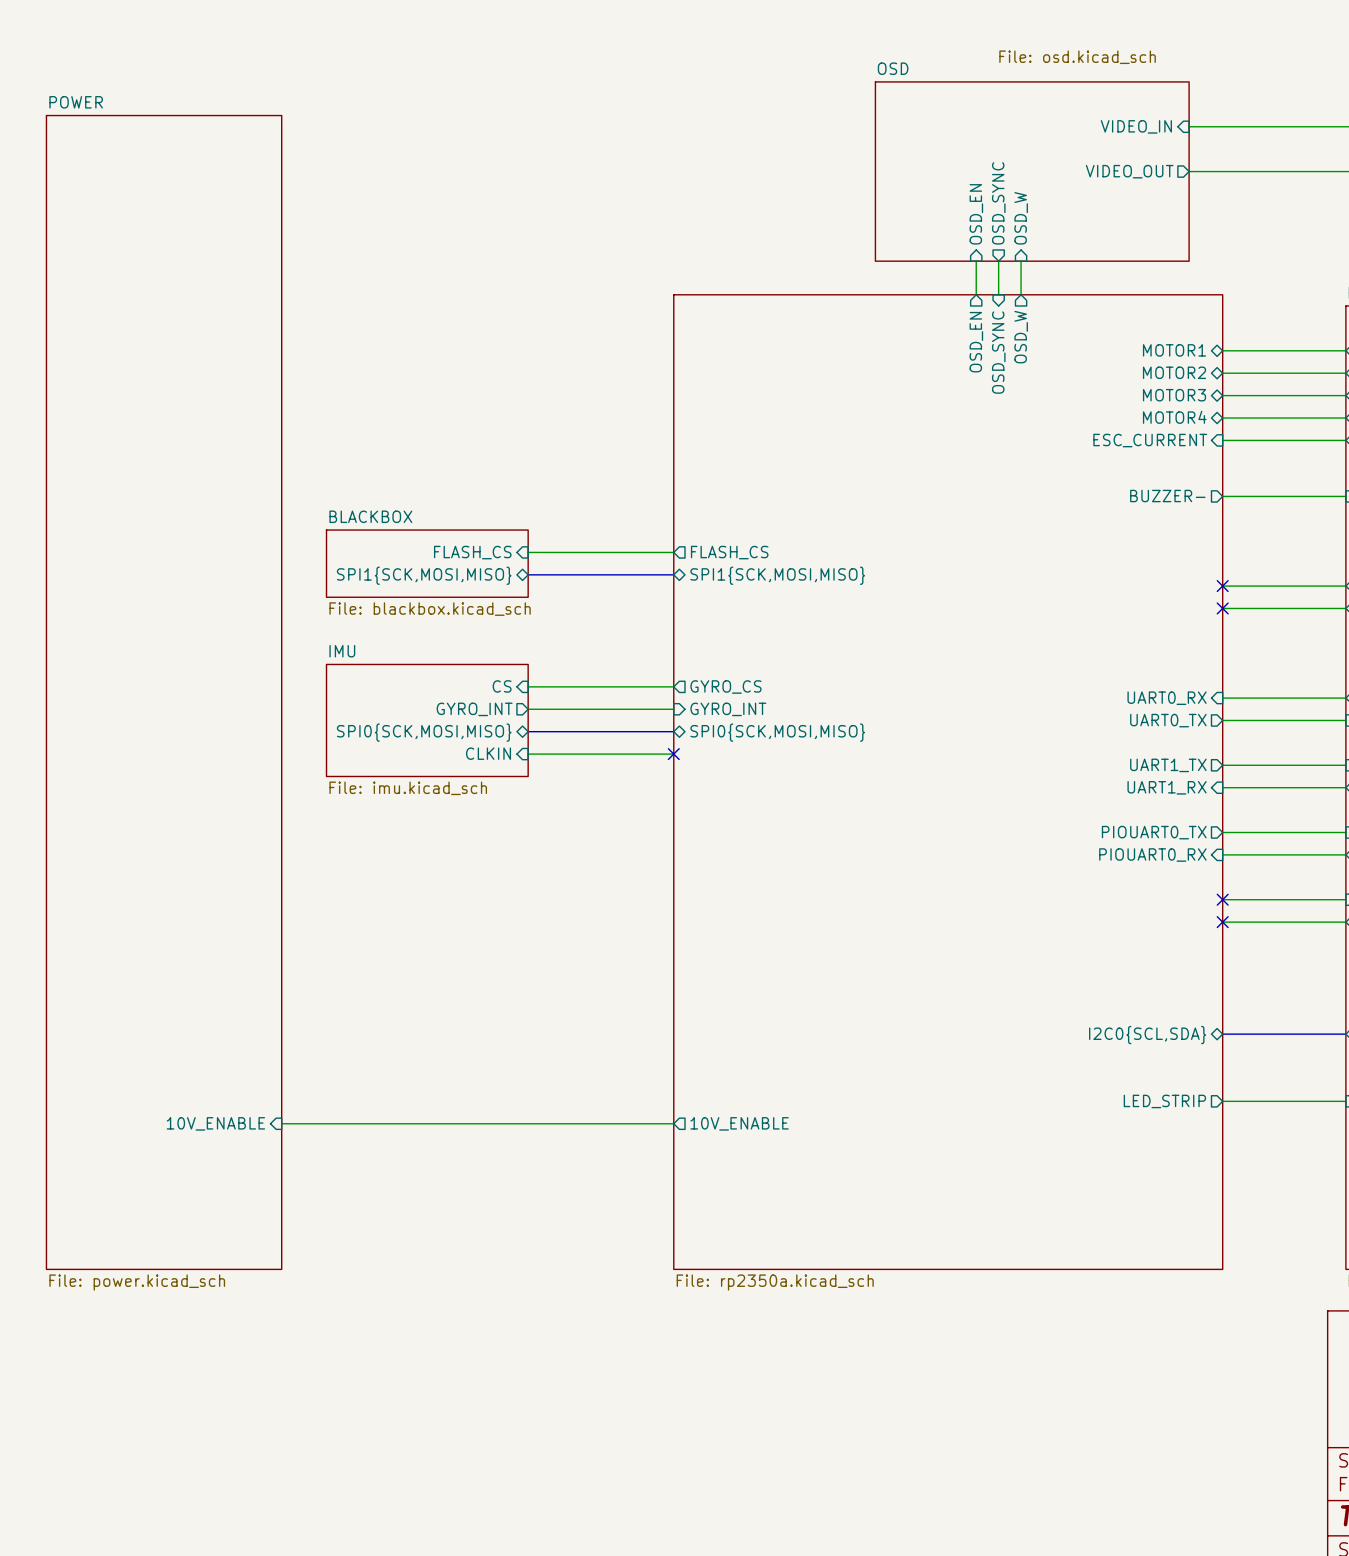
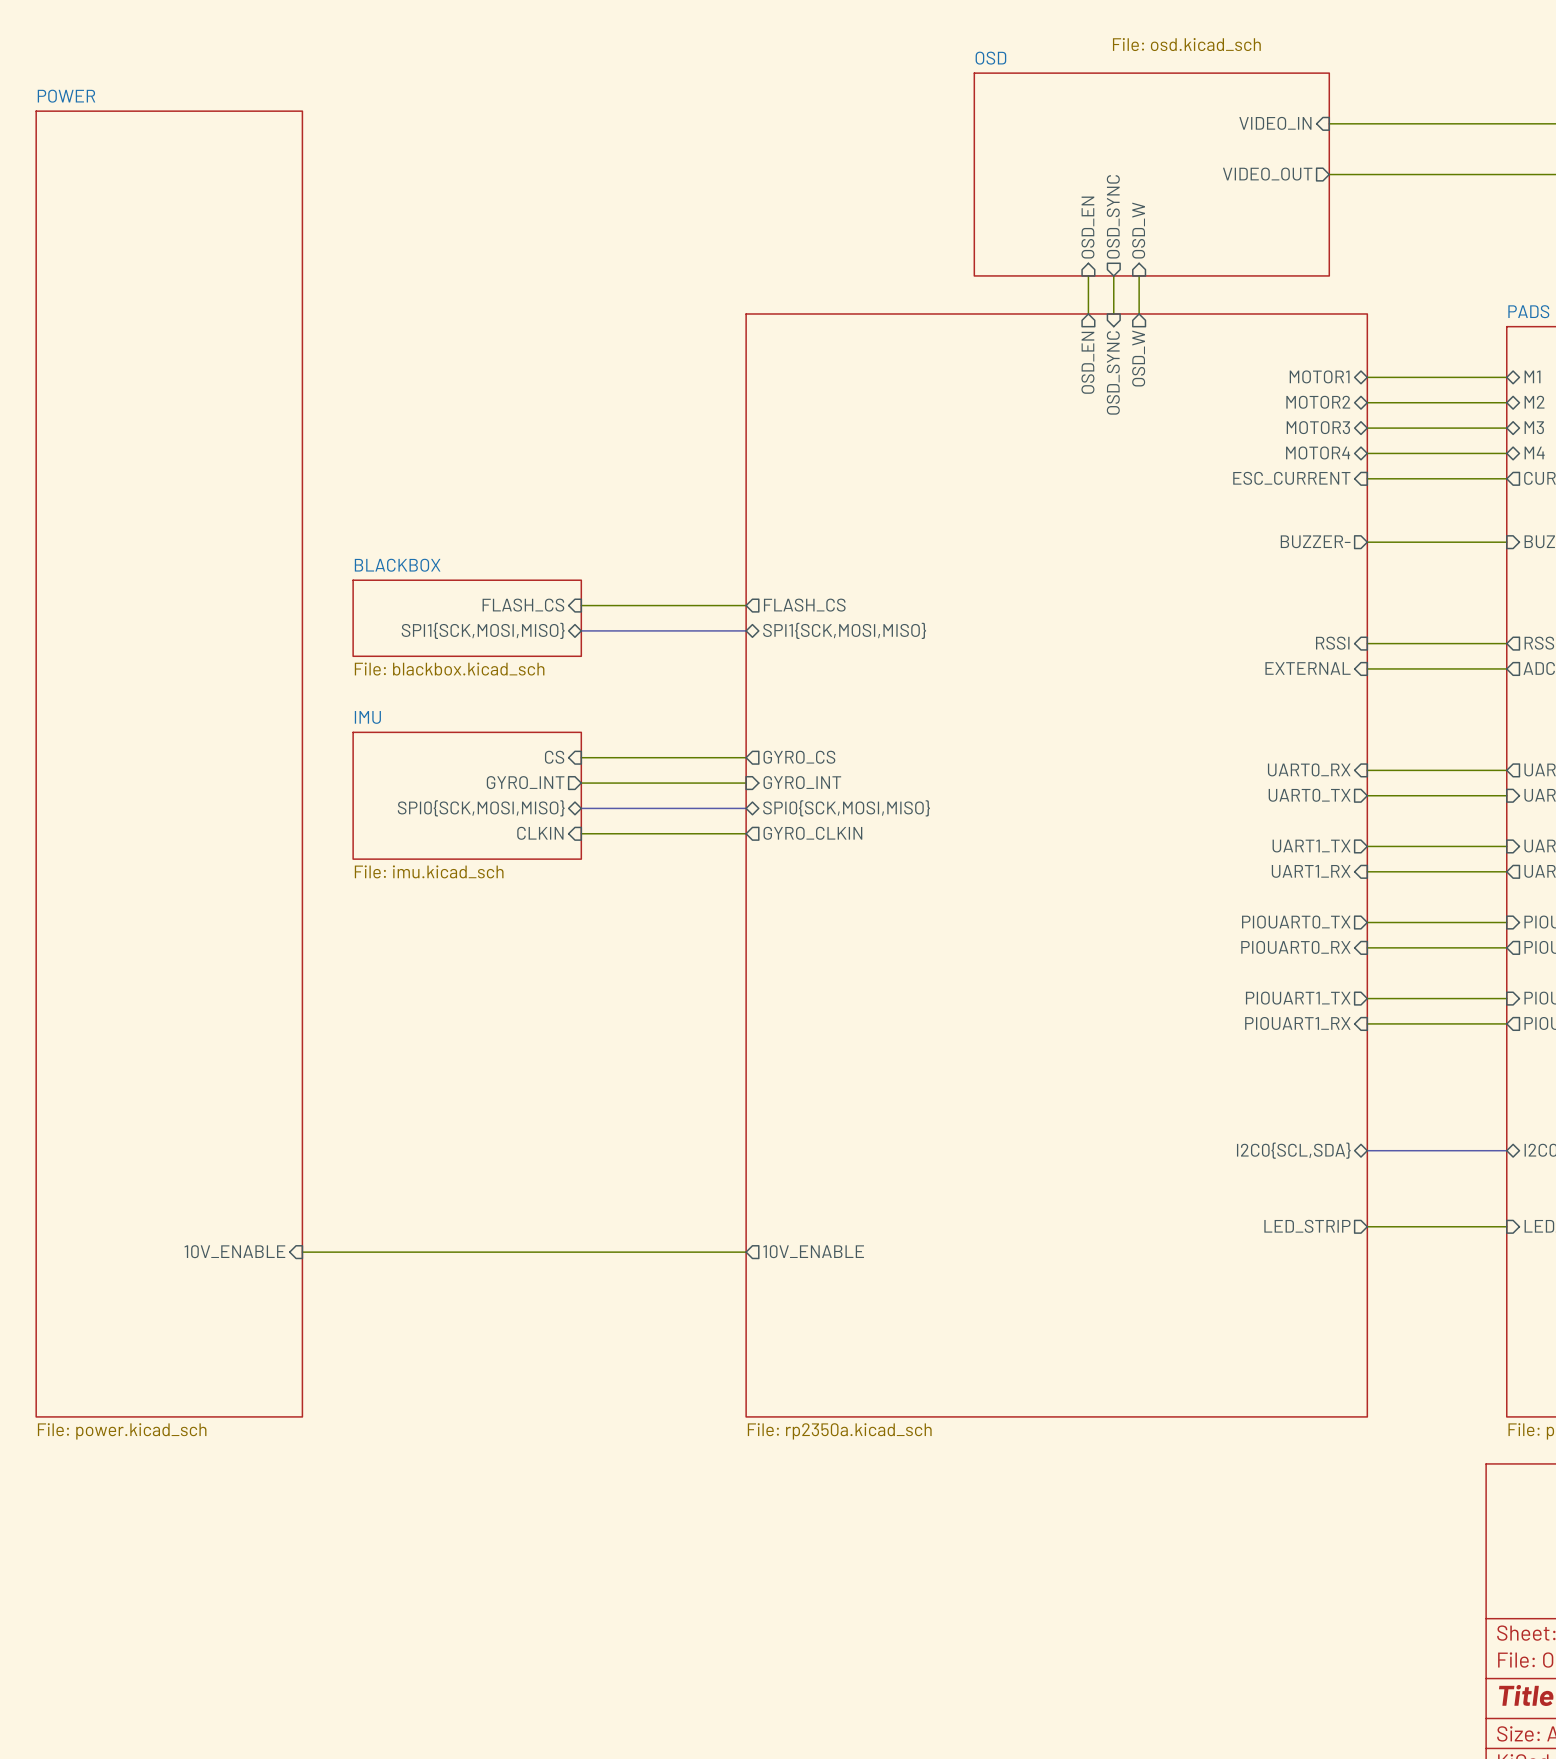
sheet pin: none -> RSSI (1332, 643)
no-connect mark: (1222, 586) -> none
sheet pin: none -> EXTERNAL (1308, 668)
no-connect mark: (1222, 608) -> none
no-connect mark: (673, 754) -> none
sheet pin: none -> GYRO_CLKIN (812, 833)
sheet pin: none -> PIOUART1_TX (1298, 998)
no-connect mark: (1222, 899) -> none
sheet pin: none -> PIOUART1_RX (1297, 1023)
no-connect mark: (1222, 922) -> none

